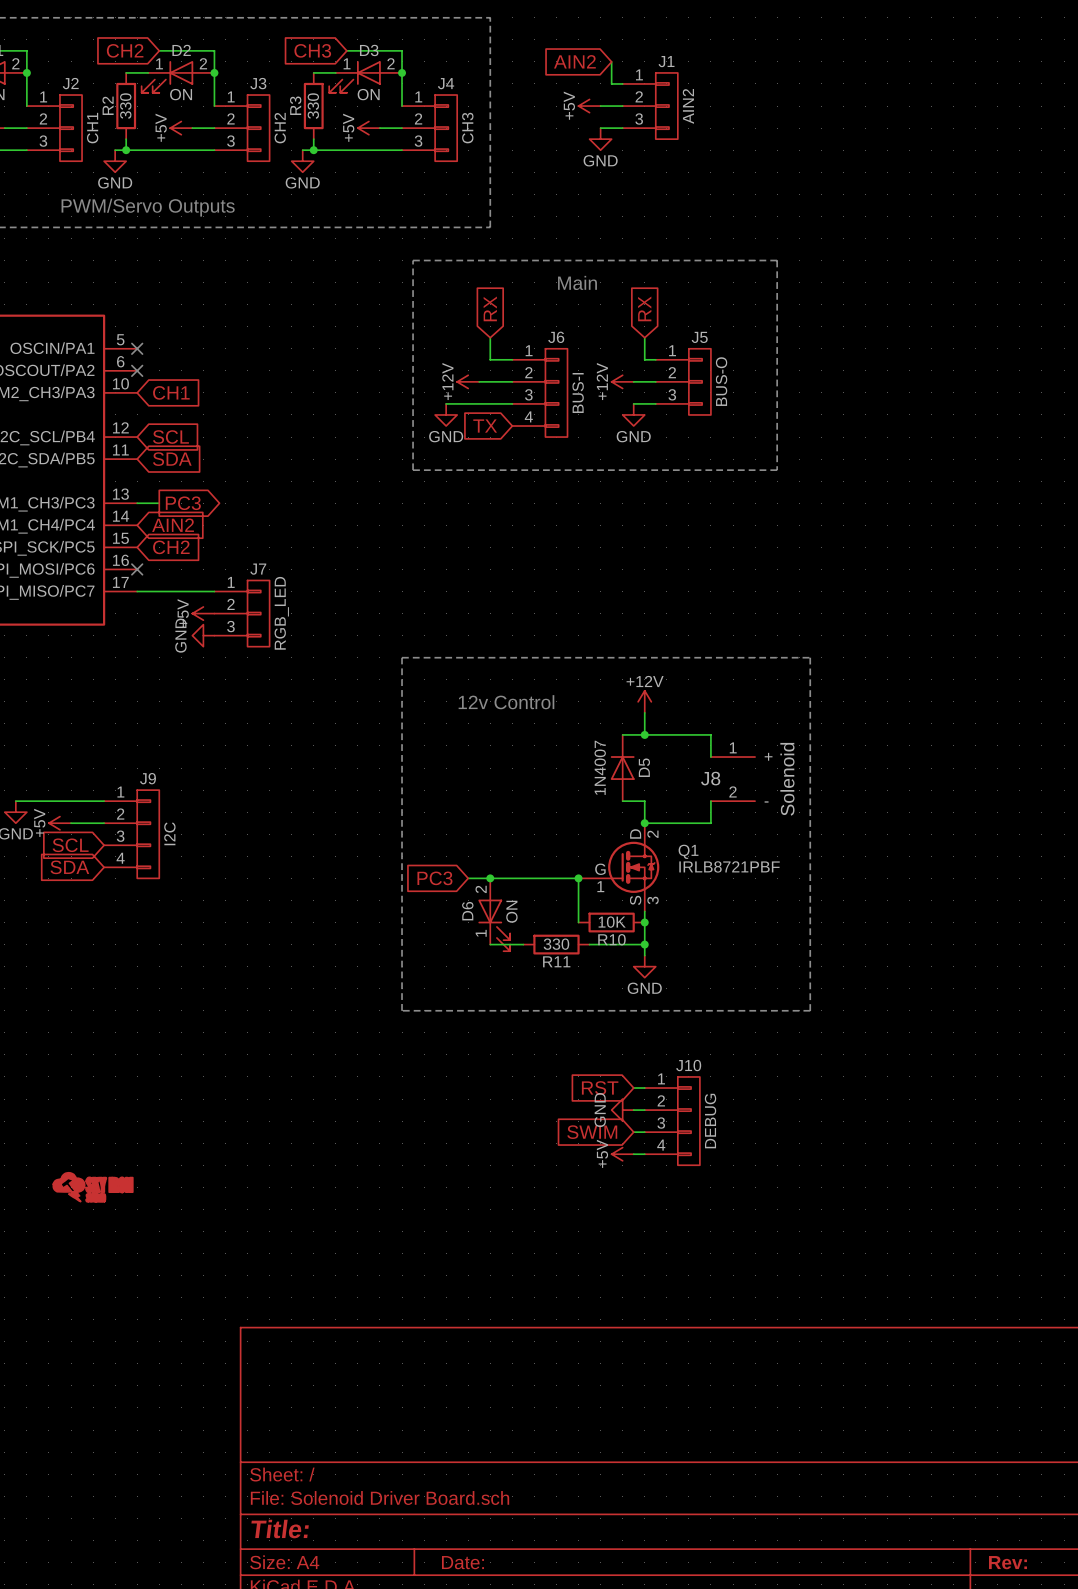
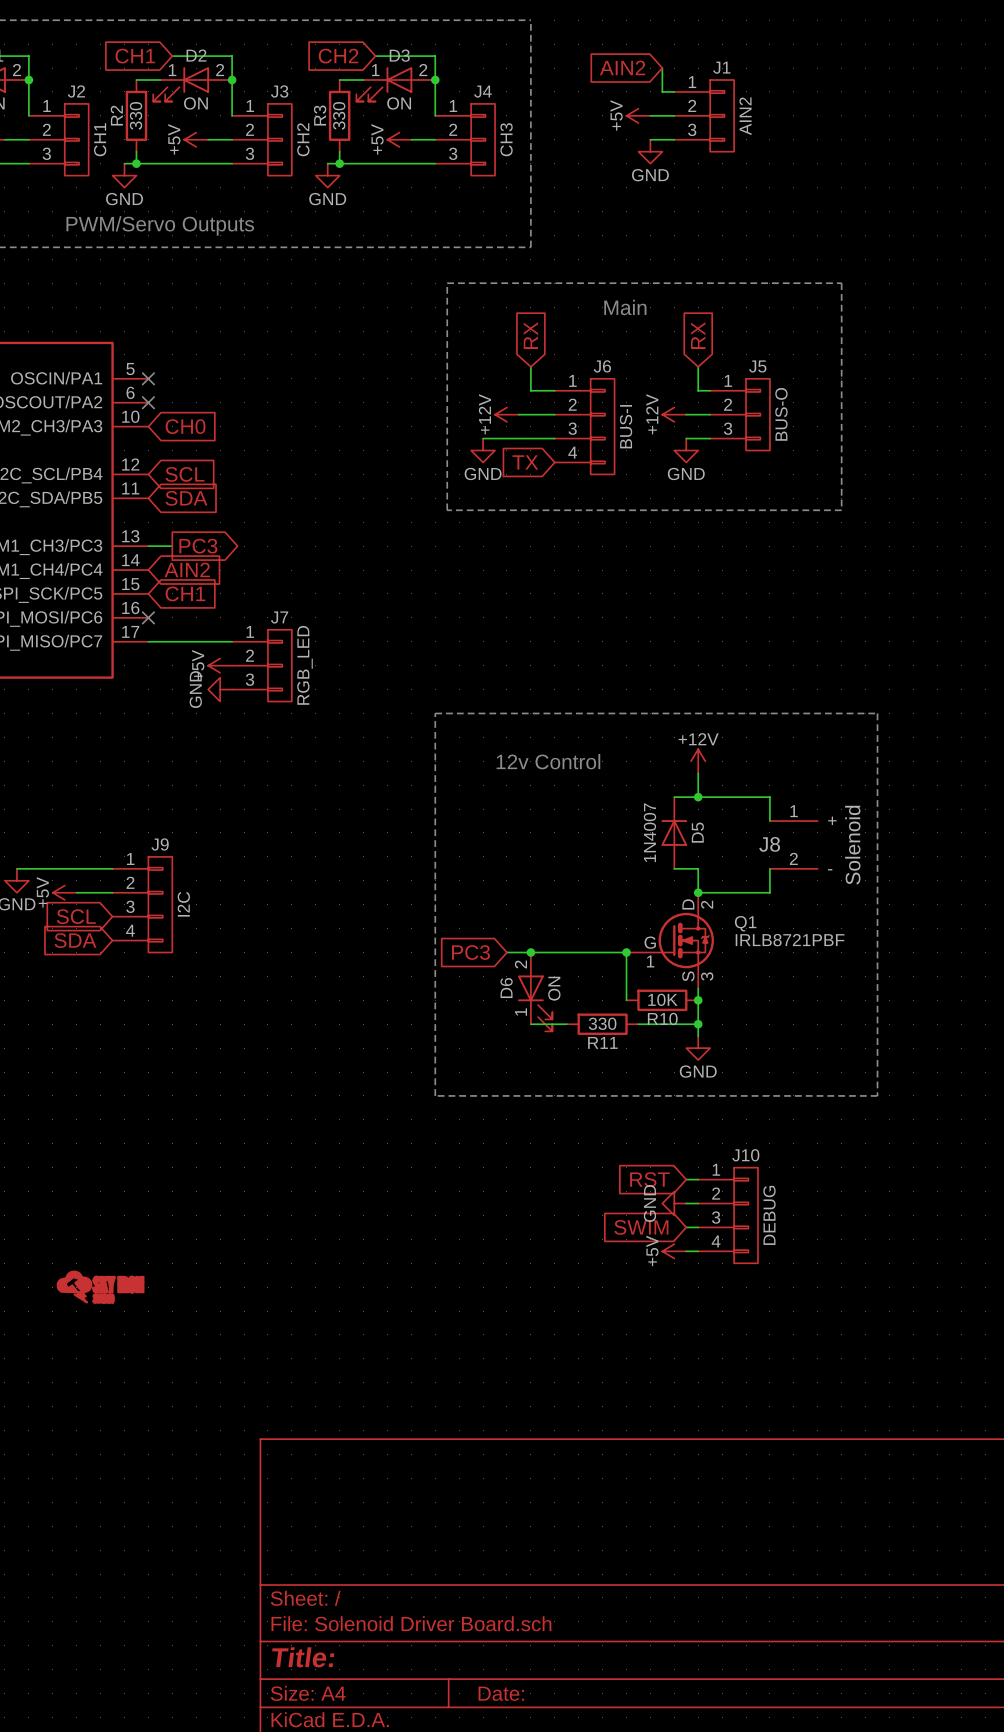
global label: CH2 (125, 50) -> CH1 (135, 56)
global label: CH3 (312, 50) -> CH2 (338, 56)
global label: CH1 (171, 392) -> CH0 (185, 426)
global label: CH2 (171, 547) -> CH1 (185, 593)

